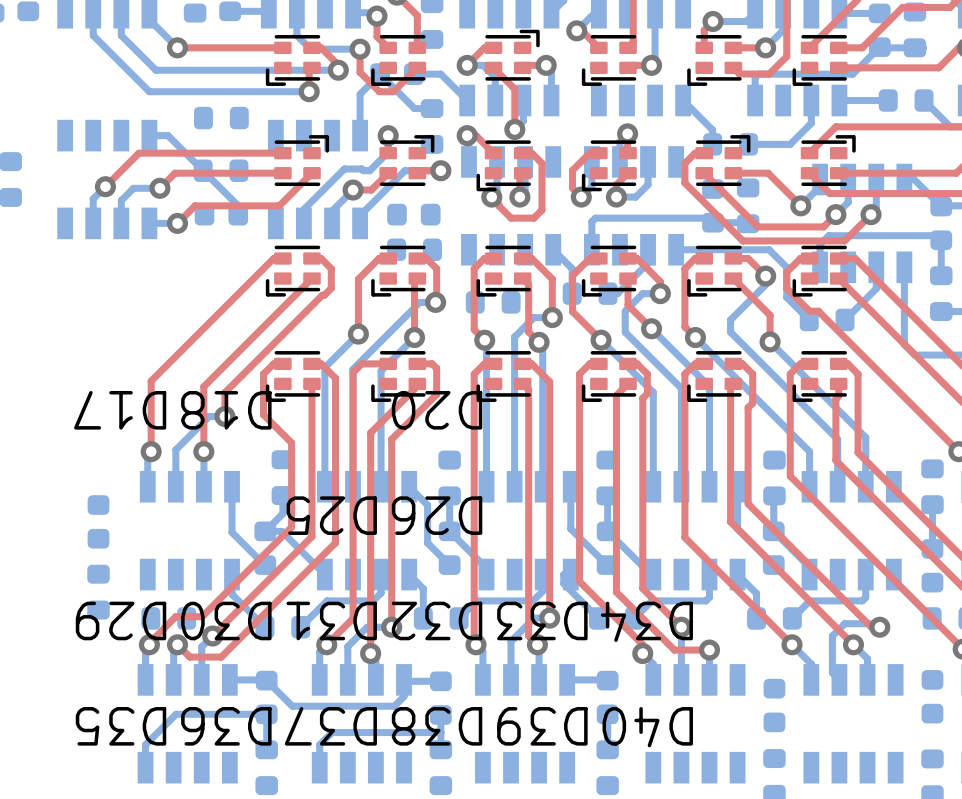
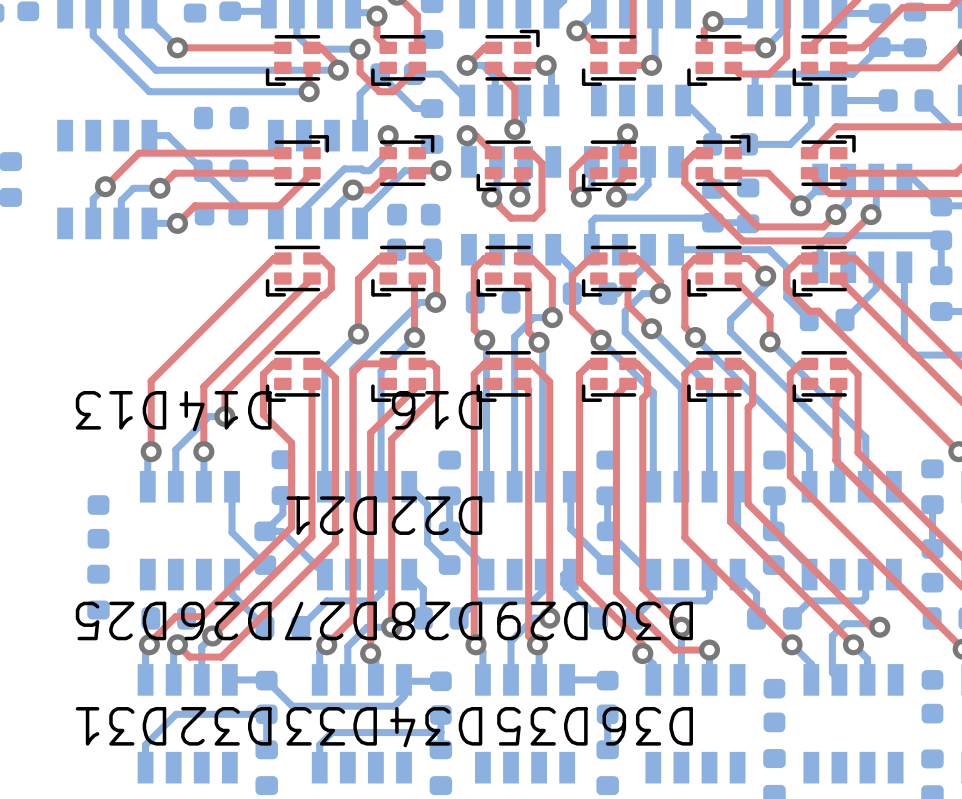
D17 name: D17 (120, 410) -> D13 (121, 410)
D18 name: D18 (226, 410) -> D14 (225, 411)
D20 name: D20 (437, 410) -> D16 (437, 410)
D25 name: D25 (331, 515) -> D21 (331, 515)
D26 name: D26 (437, 515) -> D22 (437, 515)
D29 name: D29 (121, 620) -> D25 (121, 620)
D30 name: D30 (226, 620) -> D26 (226, 620)
D31 name: D31 (331, 620) -> D27 (330, 620)
D32 name: D32 (437, 620) -> D28 (437, 620)
D33 name: D33 (542, 620) -> D29 (542, 620)
D34 name: D34 (646, 621) -> D30 (647, 620)
D35 name: D35 (121, 726) -> D31 (121, 726)
D36 name: D36 (226, 726) -> D32 (226, 726)
D37 name: D37 (330, 726) -> D33 (331, 726)
D38 name: D38 (437, 726) -> D34 (436, 727)
D39 name: D39 (542, 726) -> D35 (542, 726)
D40 name: D40 (647, 727) -> D36 (647, 726)

